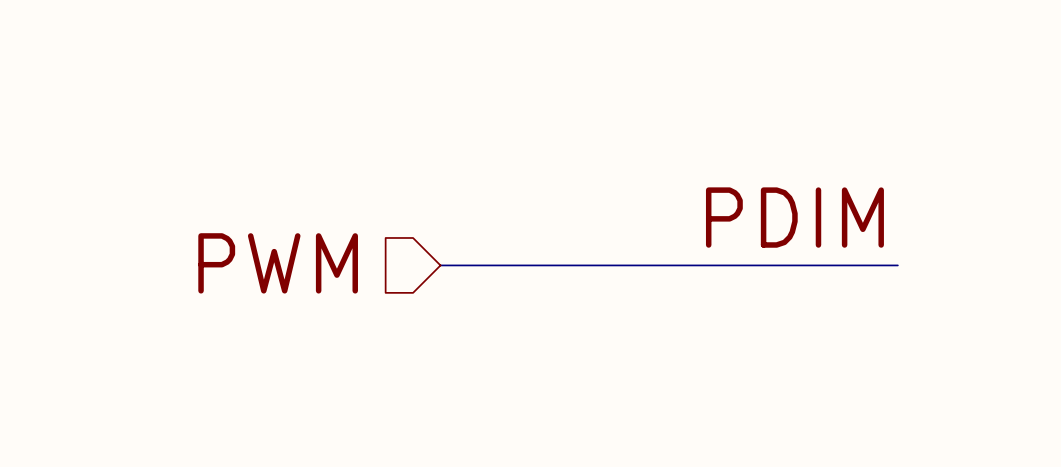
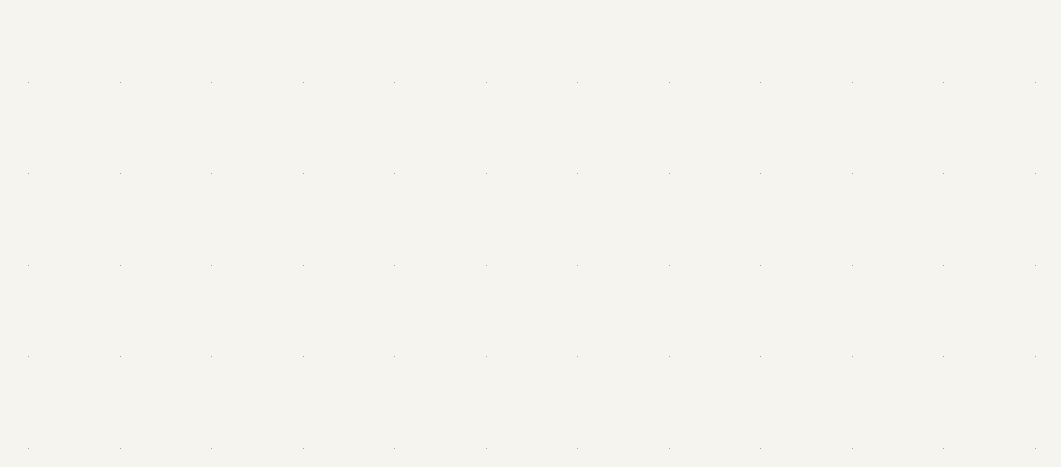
label: PDIM (794, 217) -> none
hierarchical label: PWM (278, 263) -> none
wire: (440, 265) (897, 265) -> none

